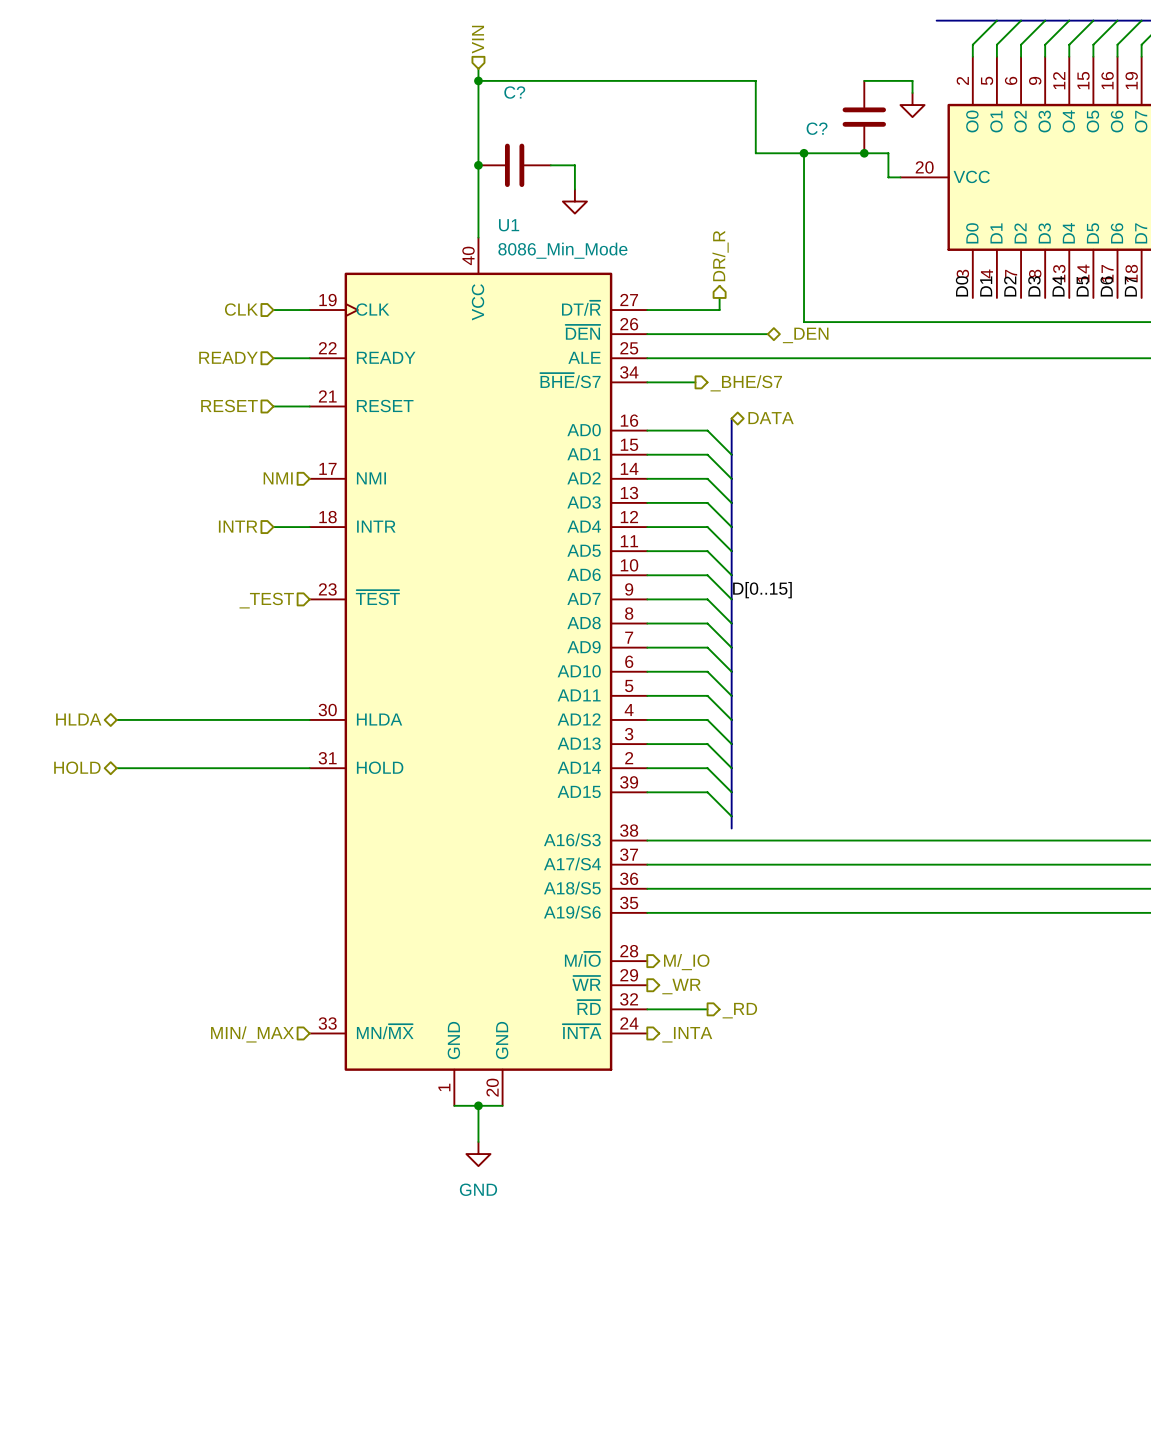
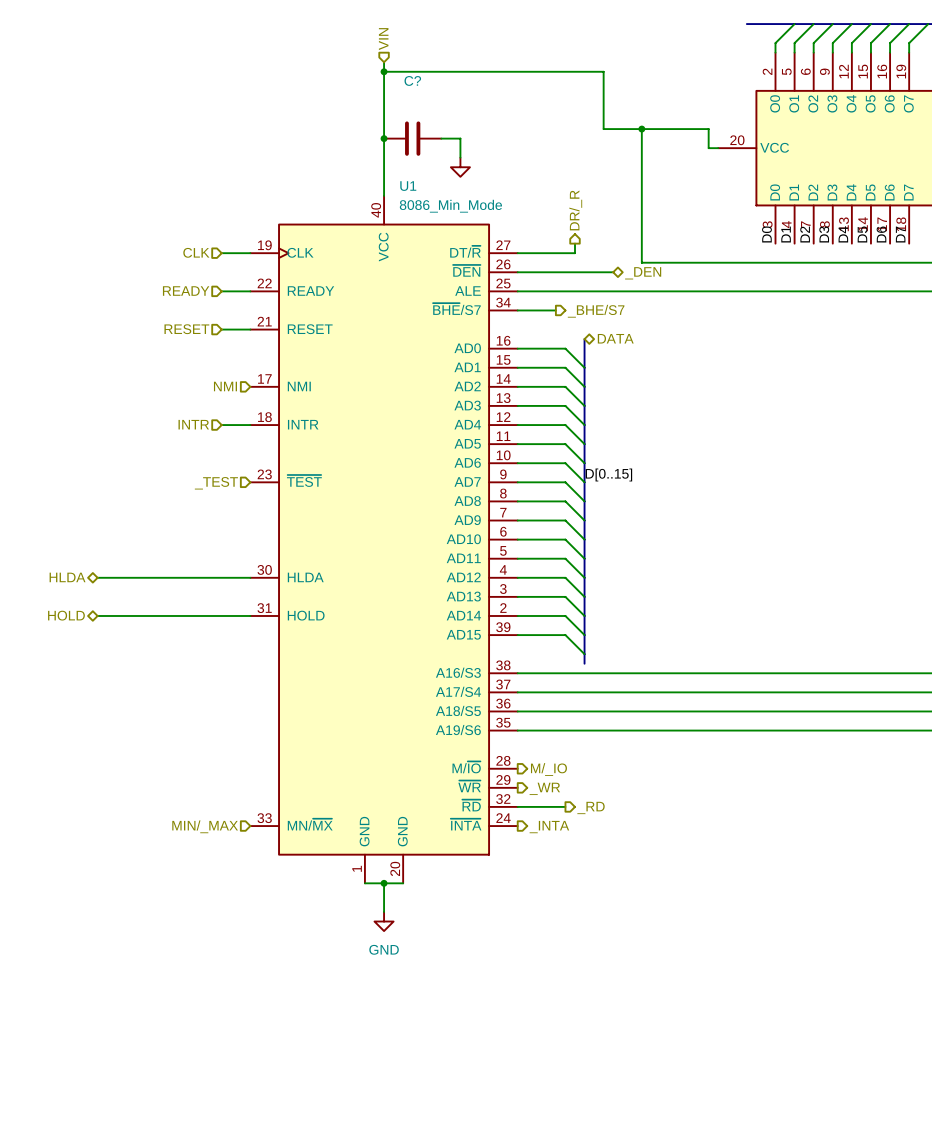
wire: (864, 80) (912, 80) (912, 92) -> none
power symbol: (912, 105) -> none
C?: (864, 117) -> none
junction: (864, 153) -> none

